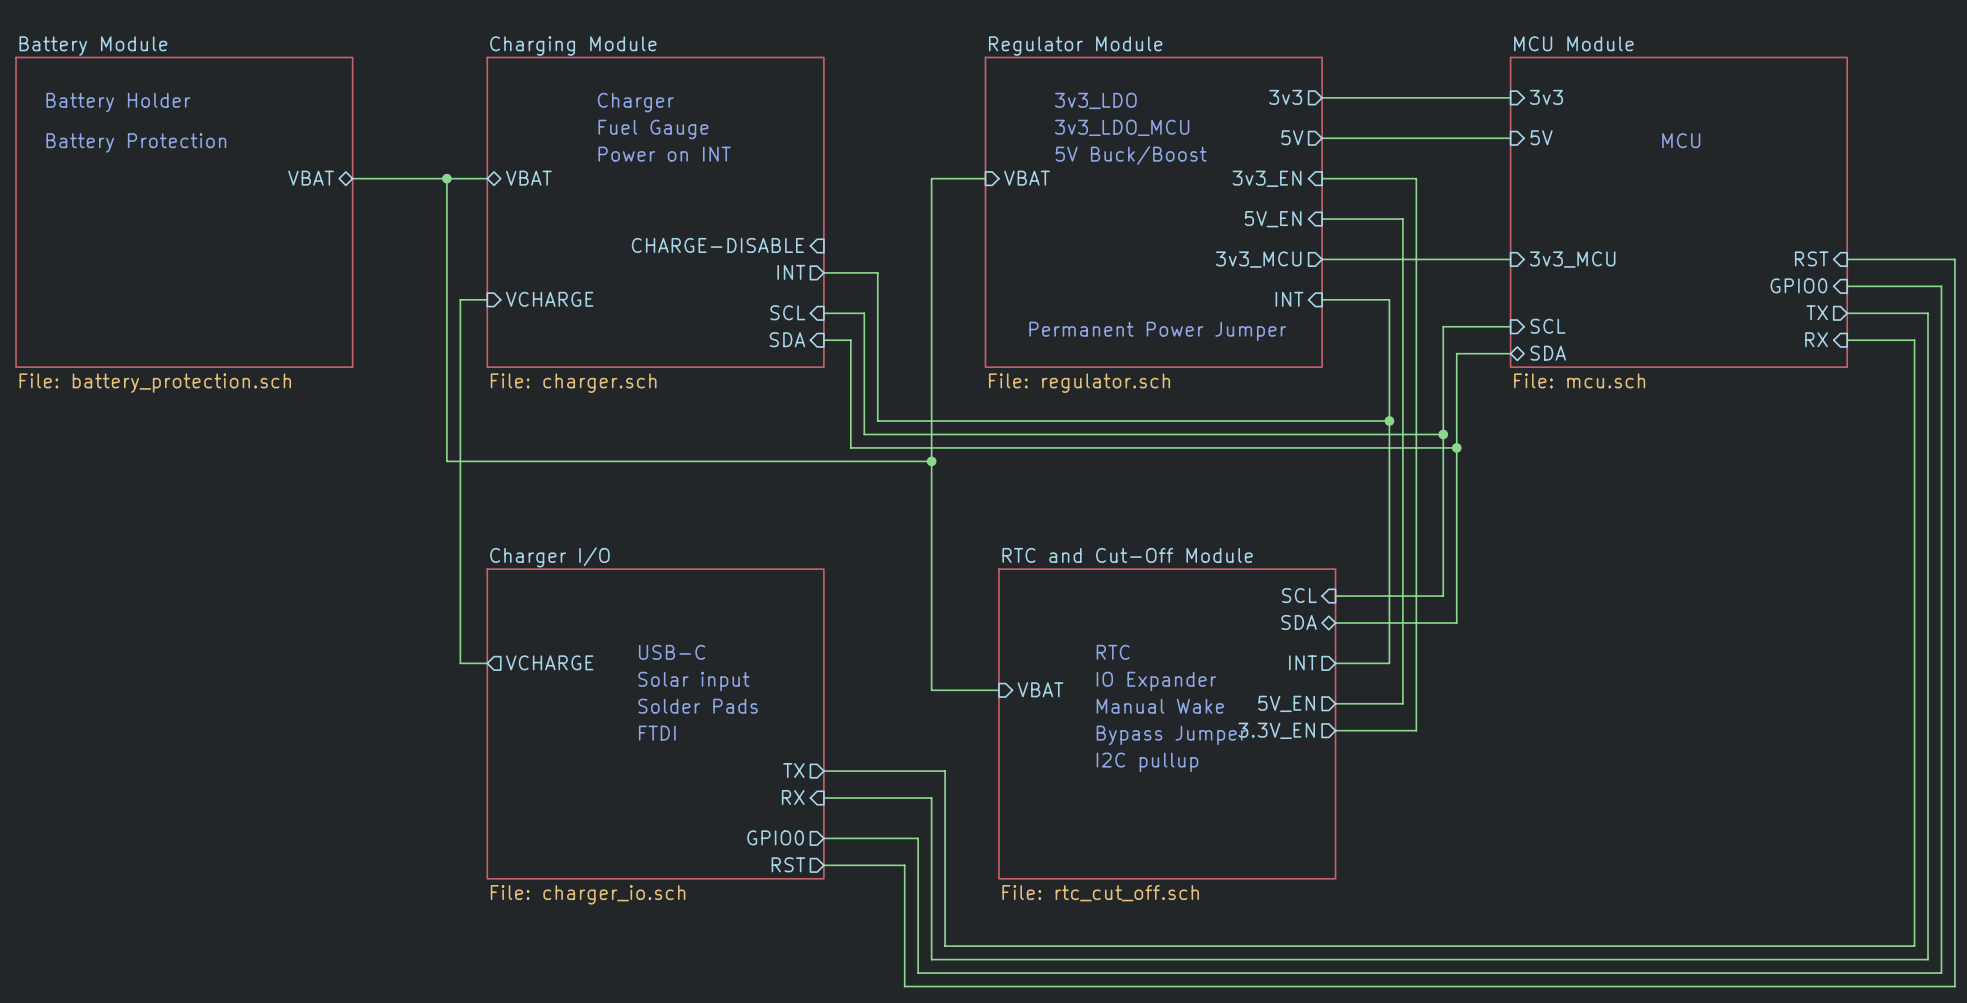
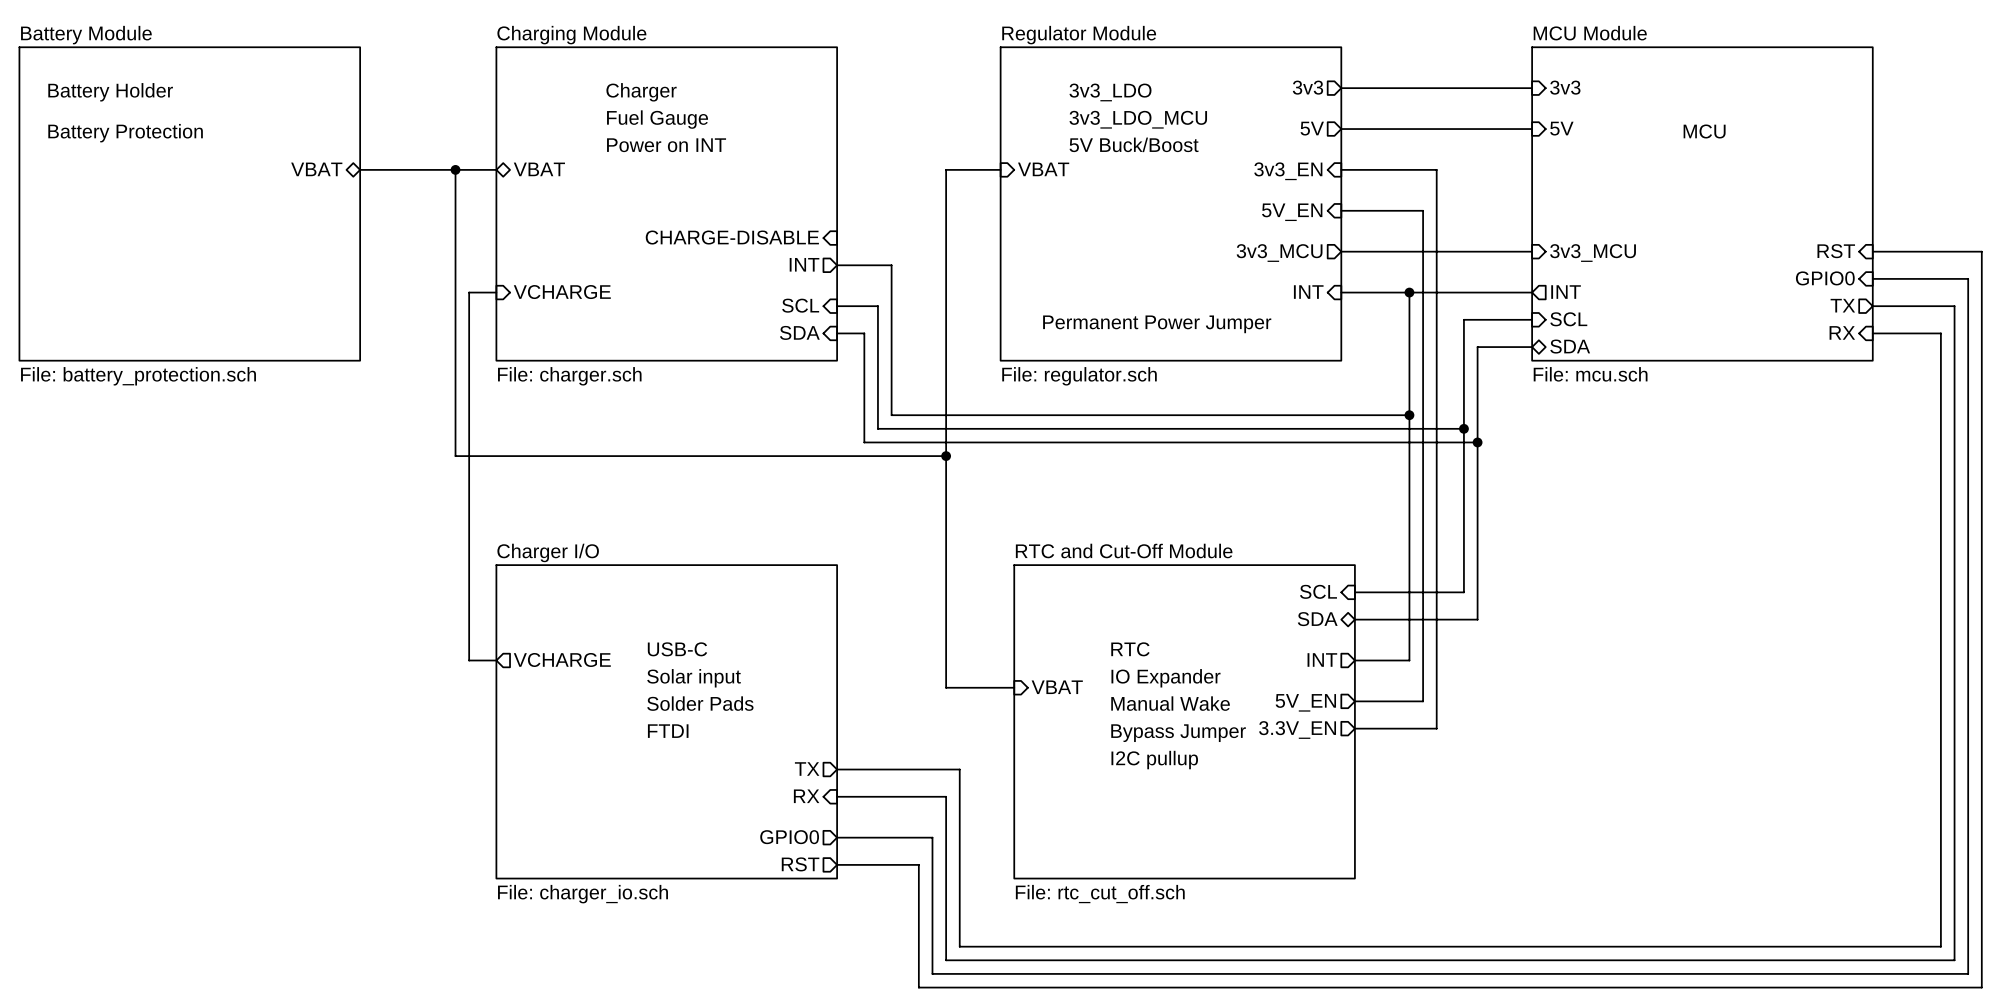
wire: none -> (1409, 292) (1532, 292)
junction: none -> (1409, 292)
sheet pin: none -> INT (1566, 292)

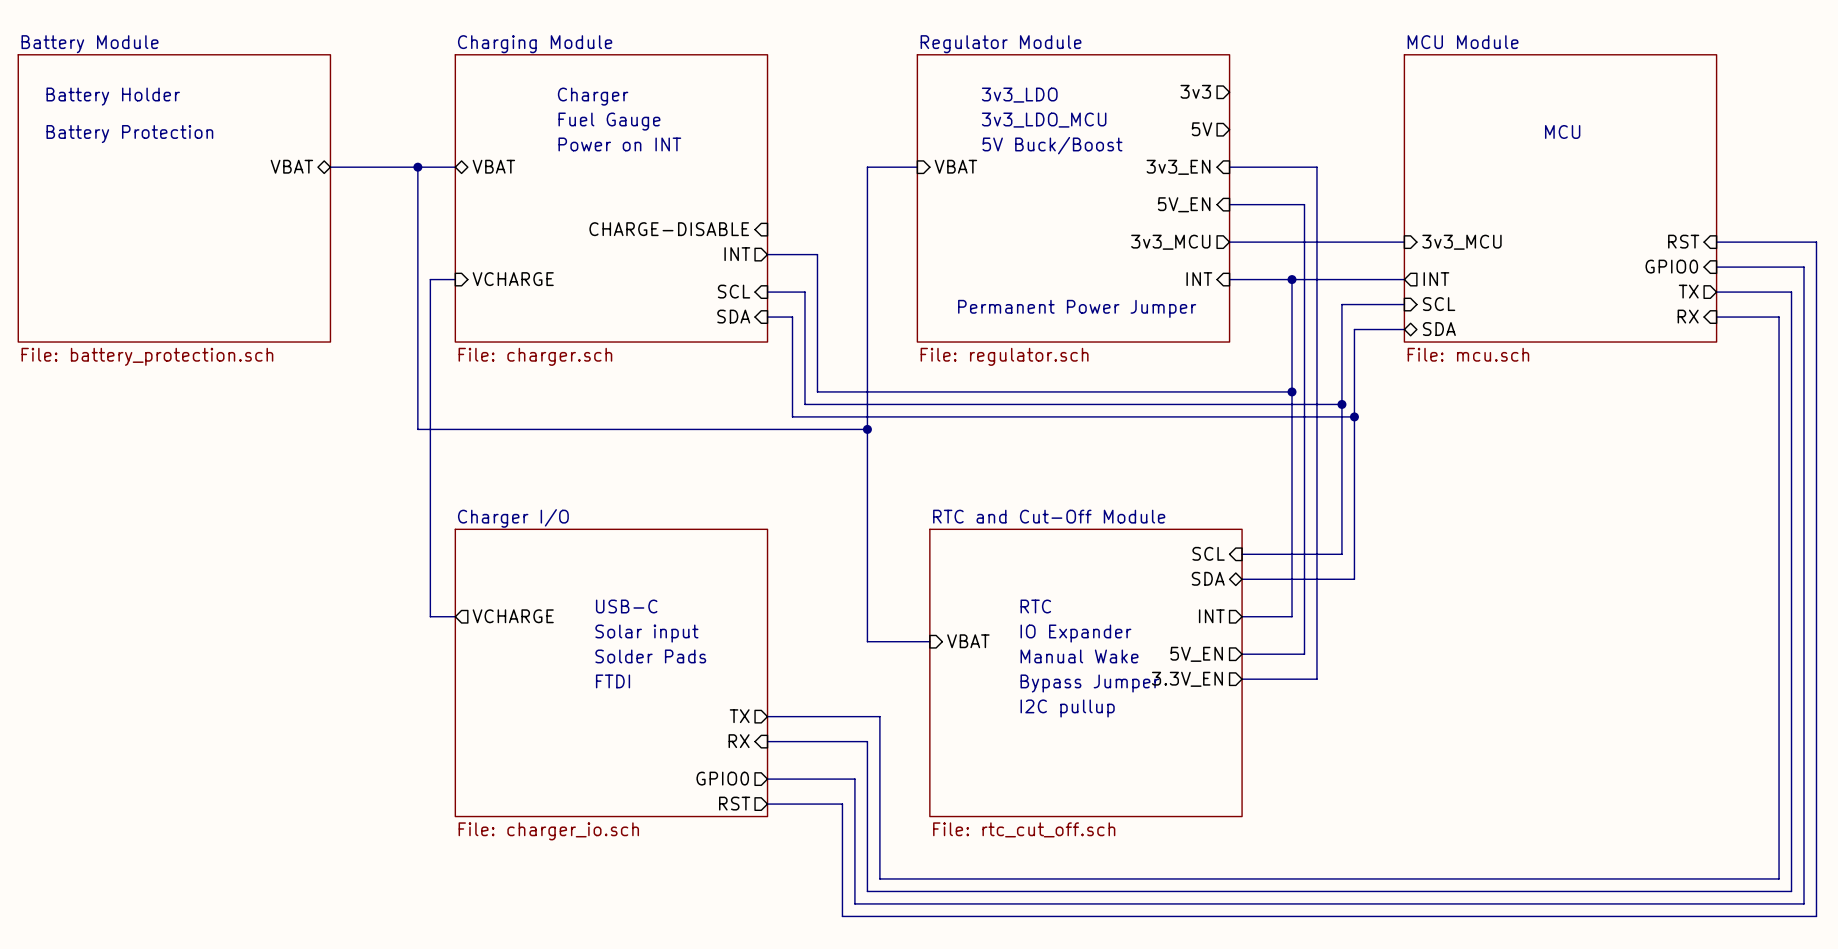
sheet pin: 3v3 (1565, 87) -> none
wire: (1341, 88) (1532, 88) -> none
sheet pin: 5V (1561, 128) -> none
wire: (1341, 129) (1532, 129) -> none

